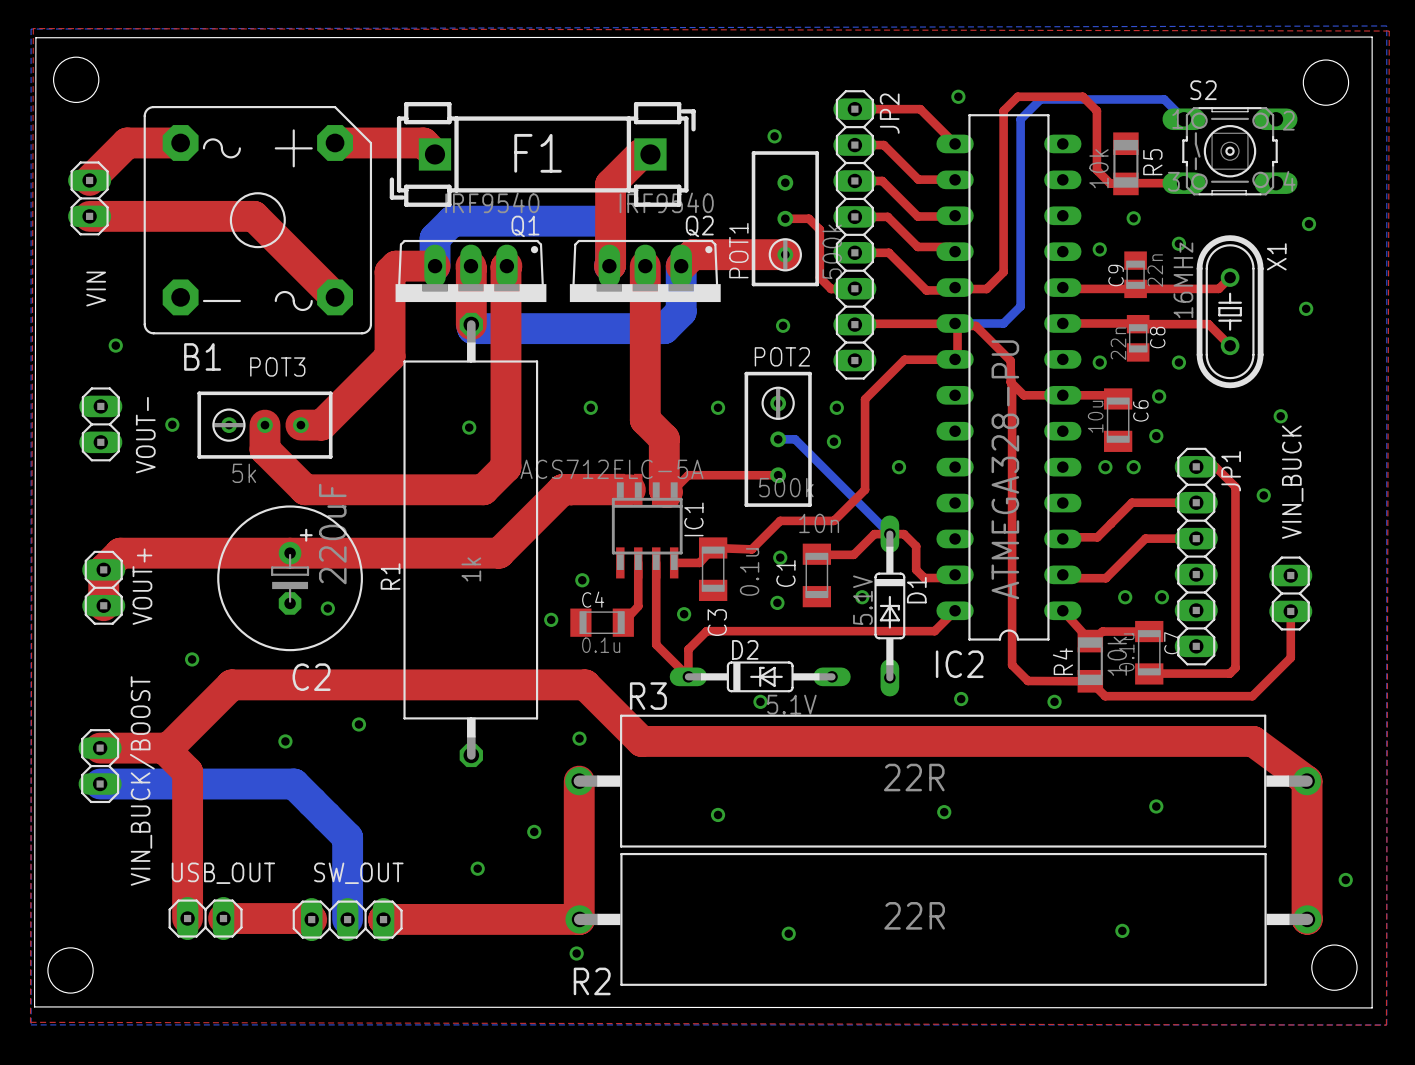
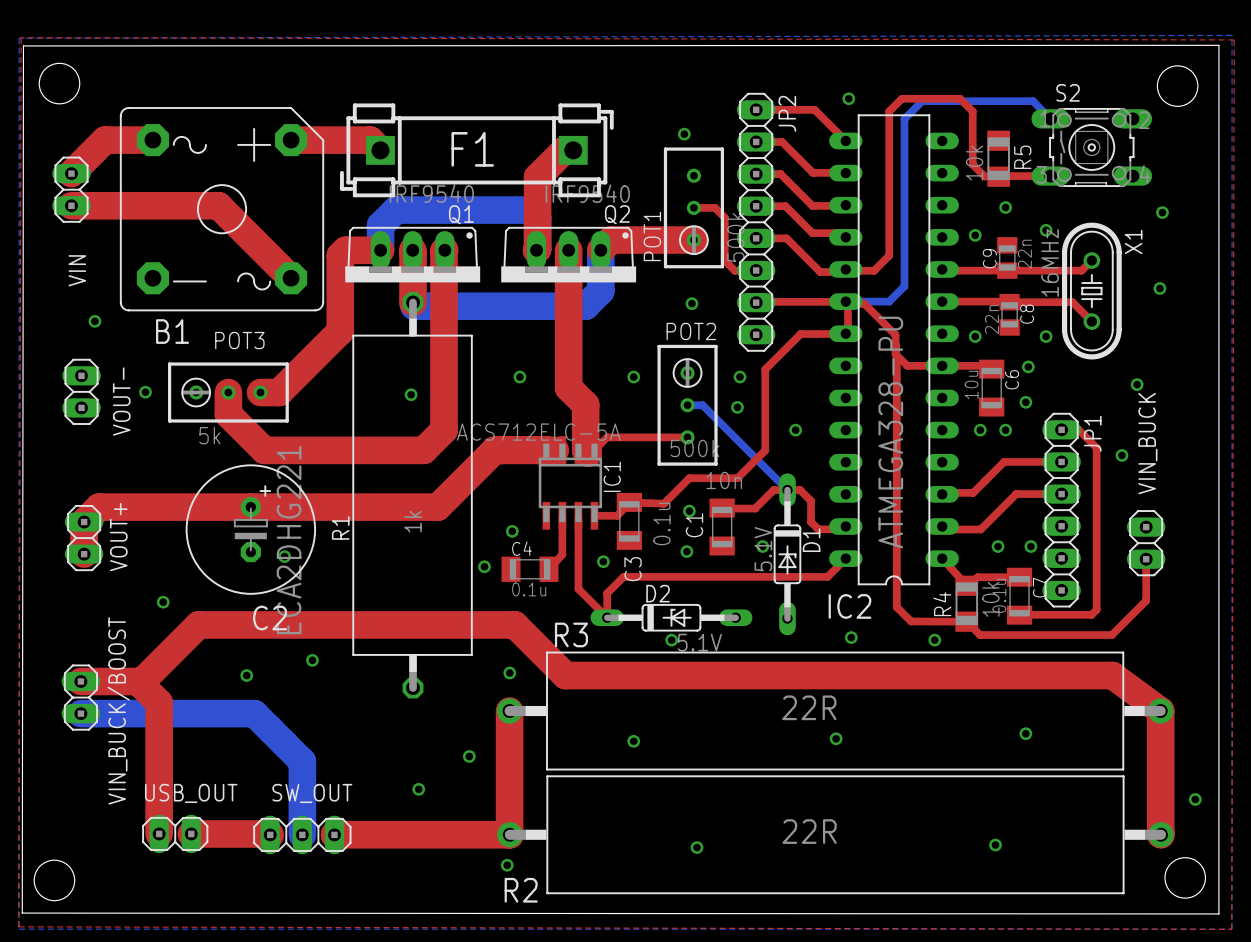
C2 value: 220uF (332, 534) -> ECA2DHG221 (289, 540)

